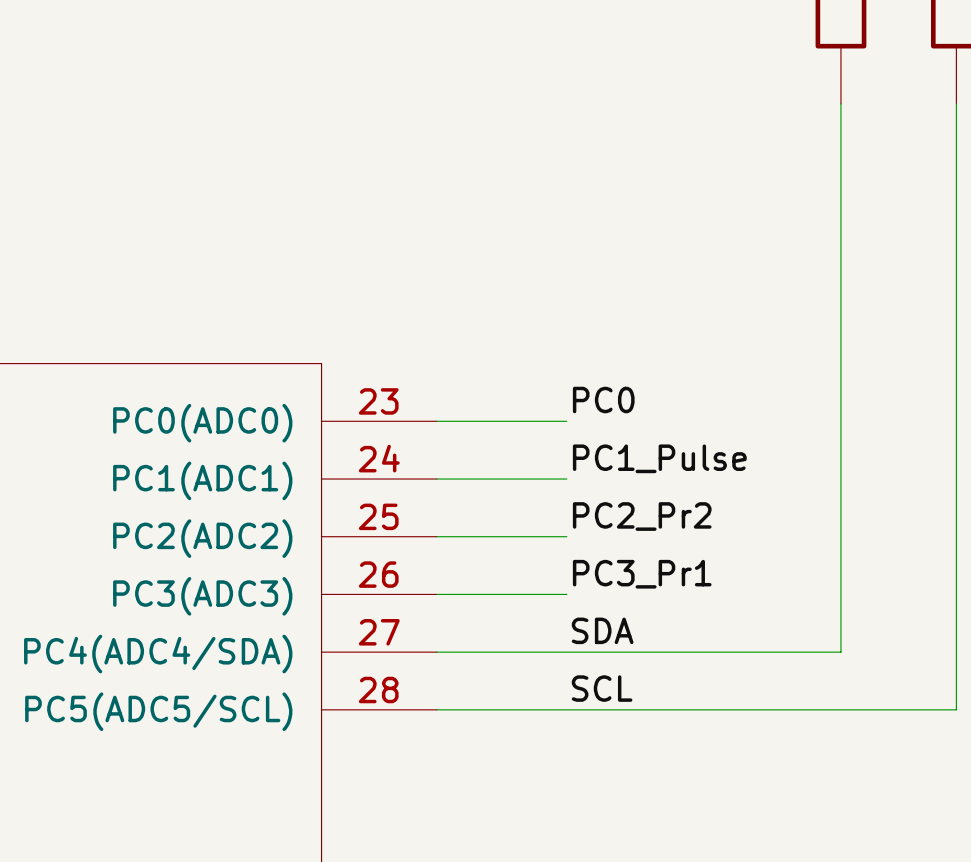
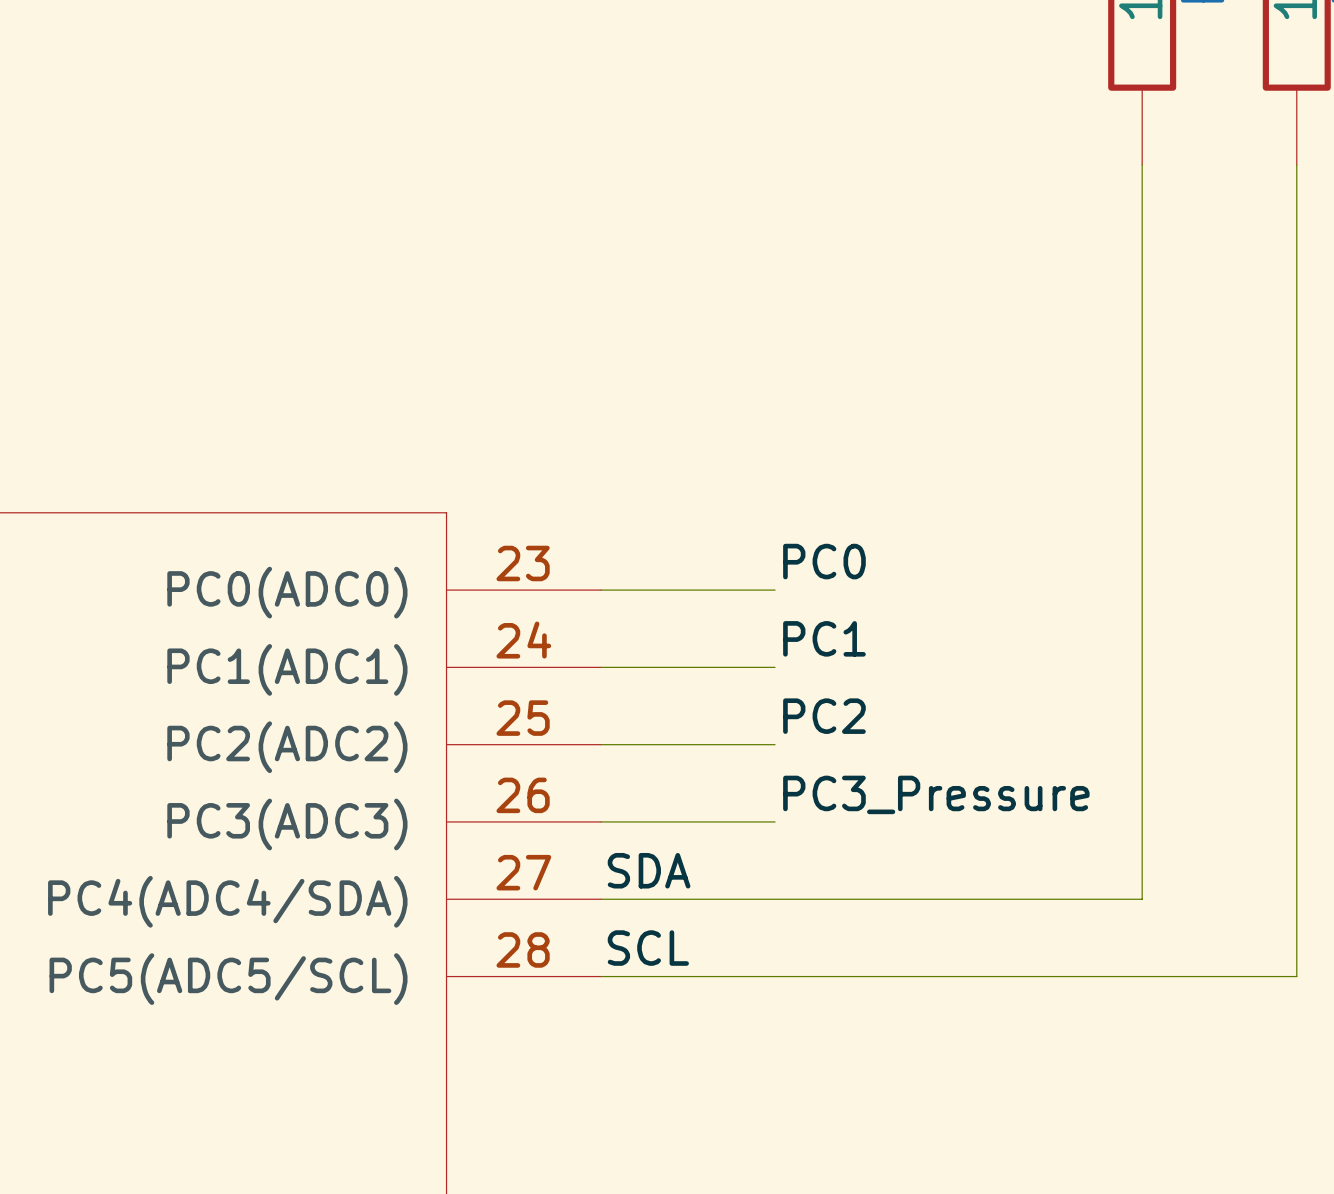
label: PC1_Pulse (659, 458) -> PC1 (824, 638)
label: PC2_Pr2 (642, 516) -> PC2 (824, 716)
label: PC3_Pr1 (642, 574) -> PC3_Pressure (936, 794)
label position: SDA (602, 630) -> SDA (649, 870)
label position: SCL (602, 688) -> SCL (648, 948)

